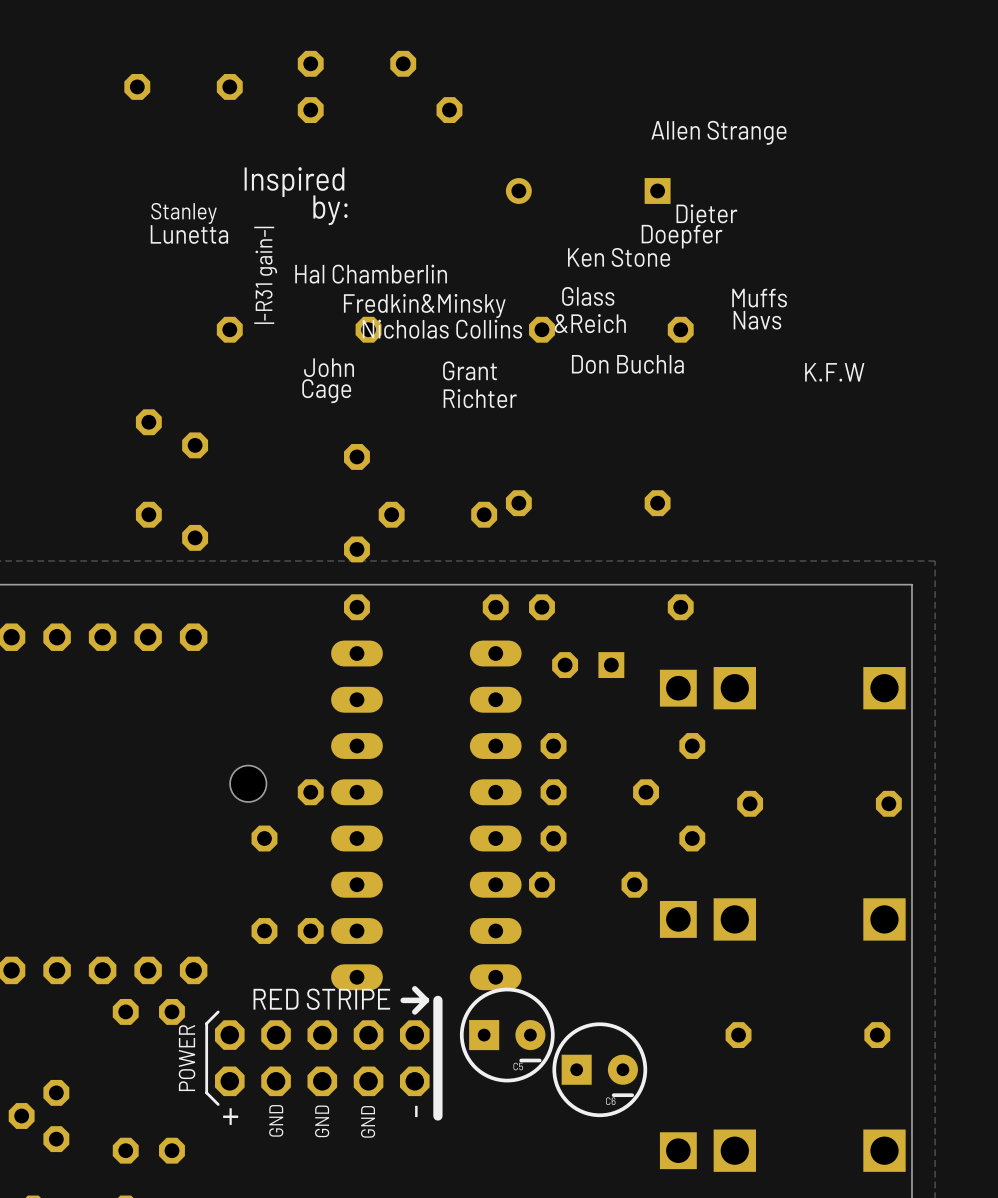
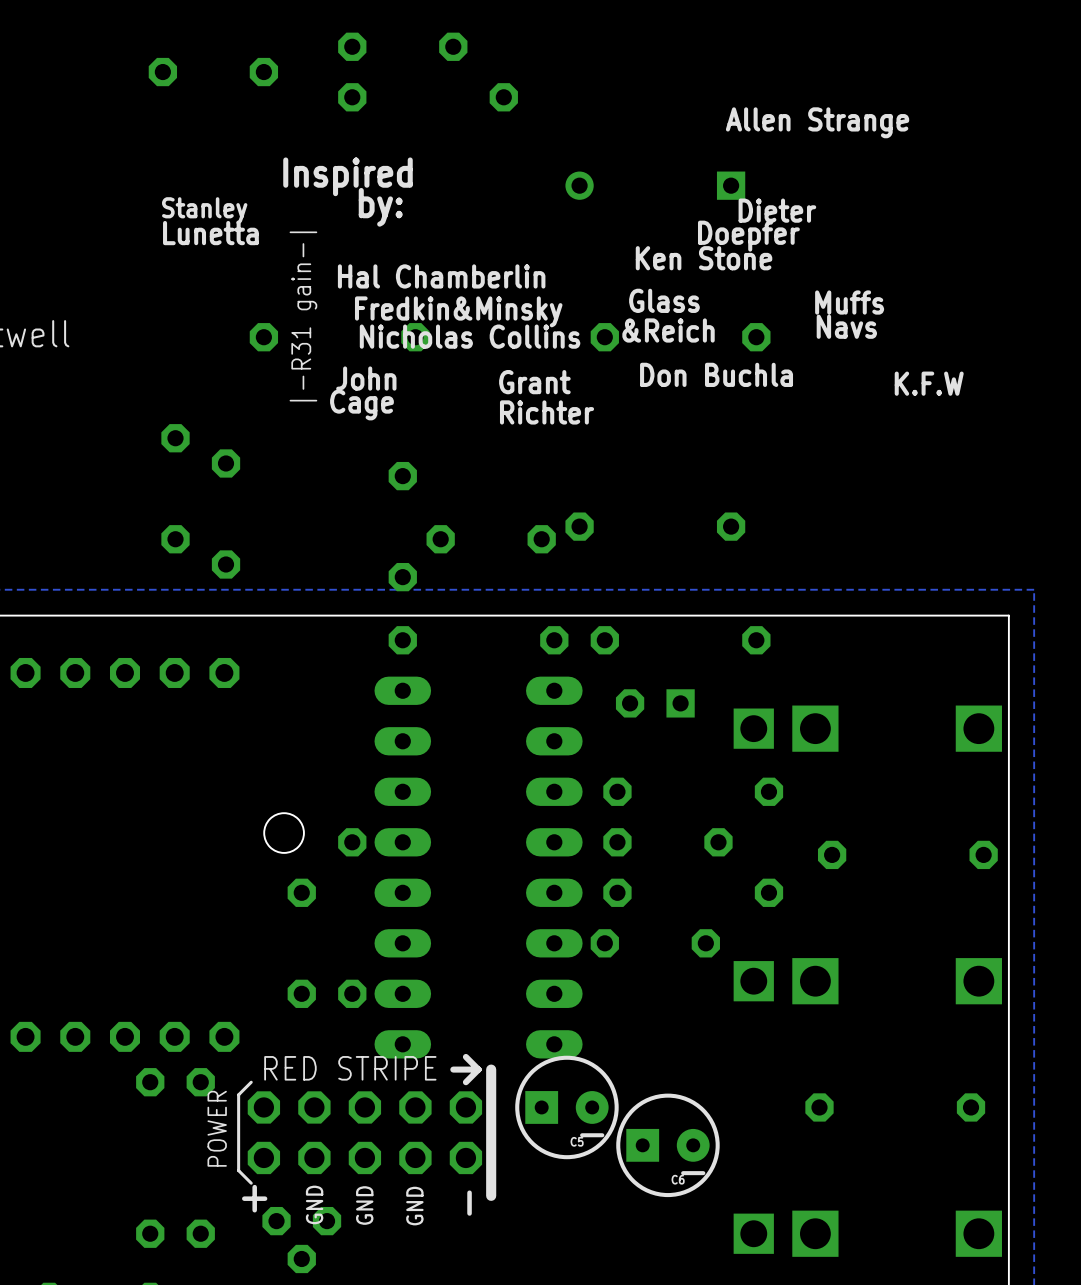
part rotation: 0° (39, 1116) -> 90° counterclockwise (301, 1240)
part position: (39, 1116) -> (301, 1240)

